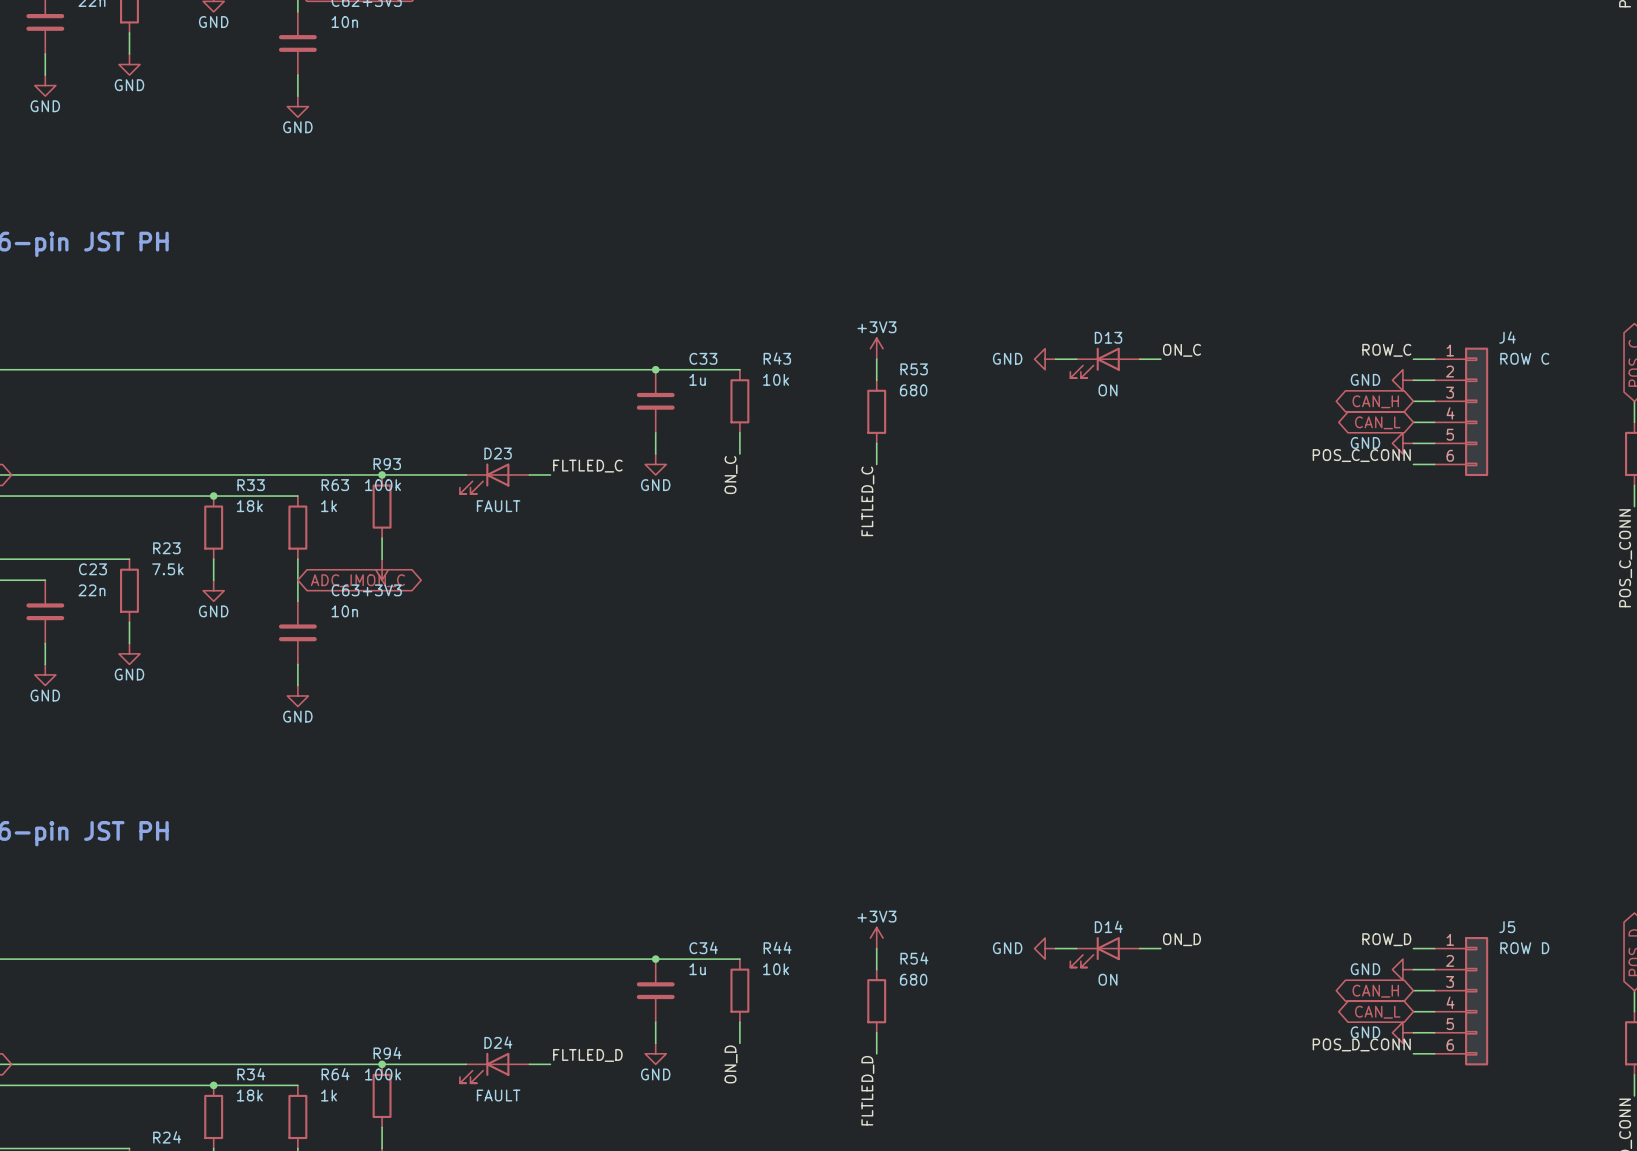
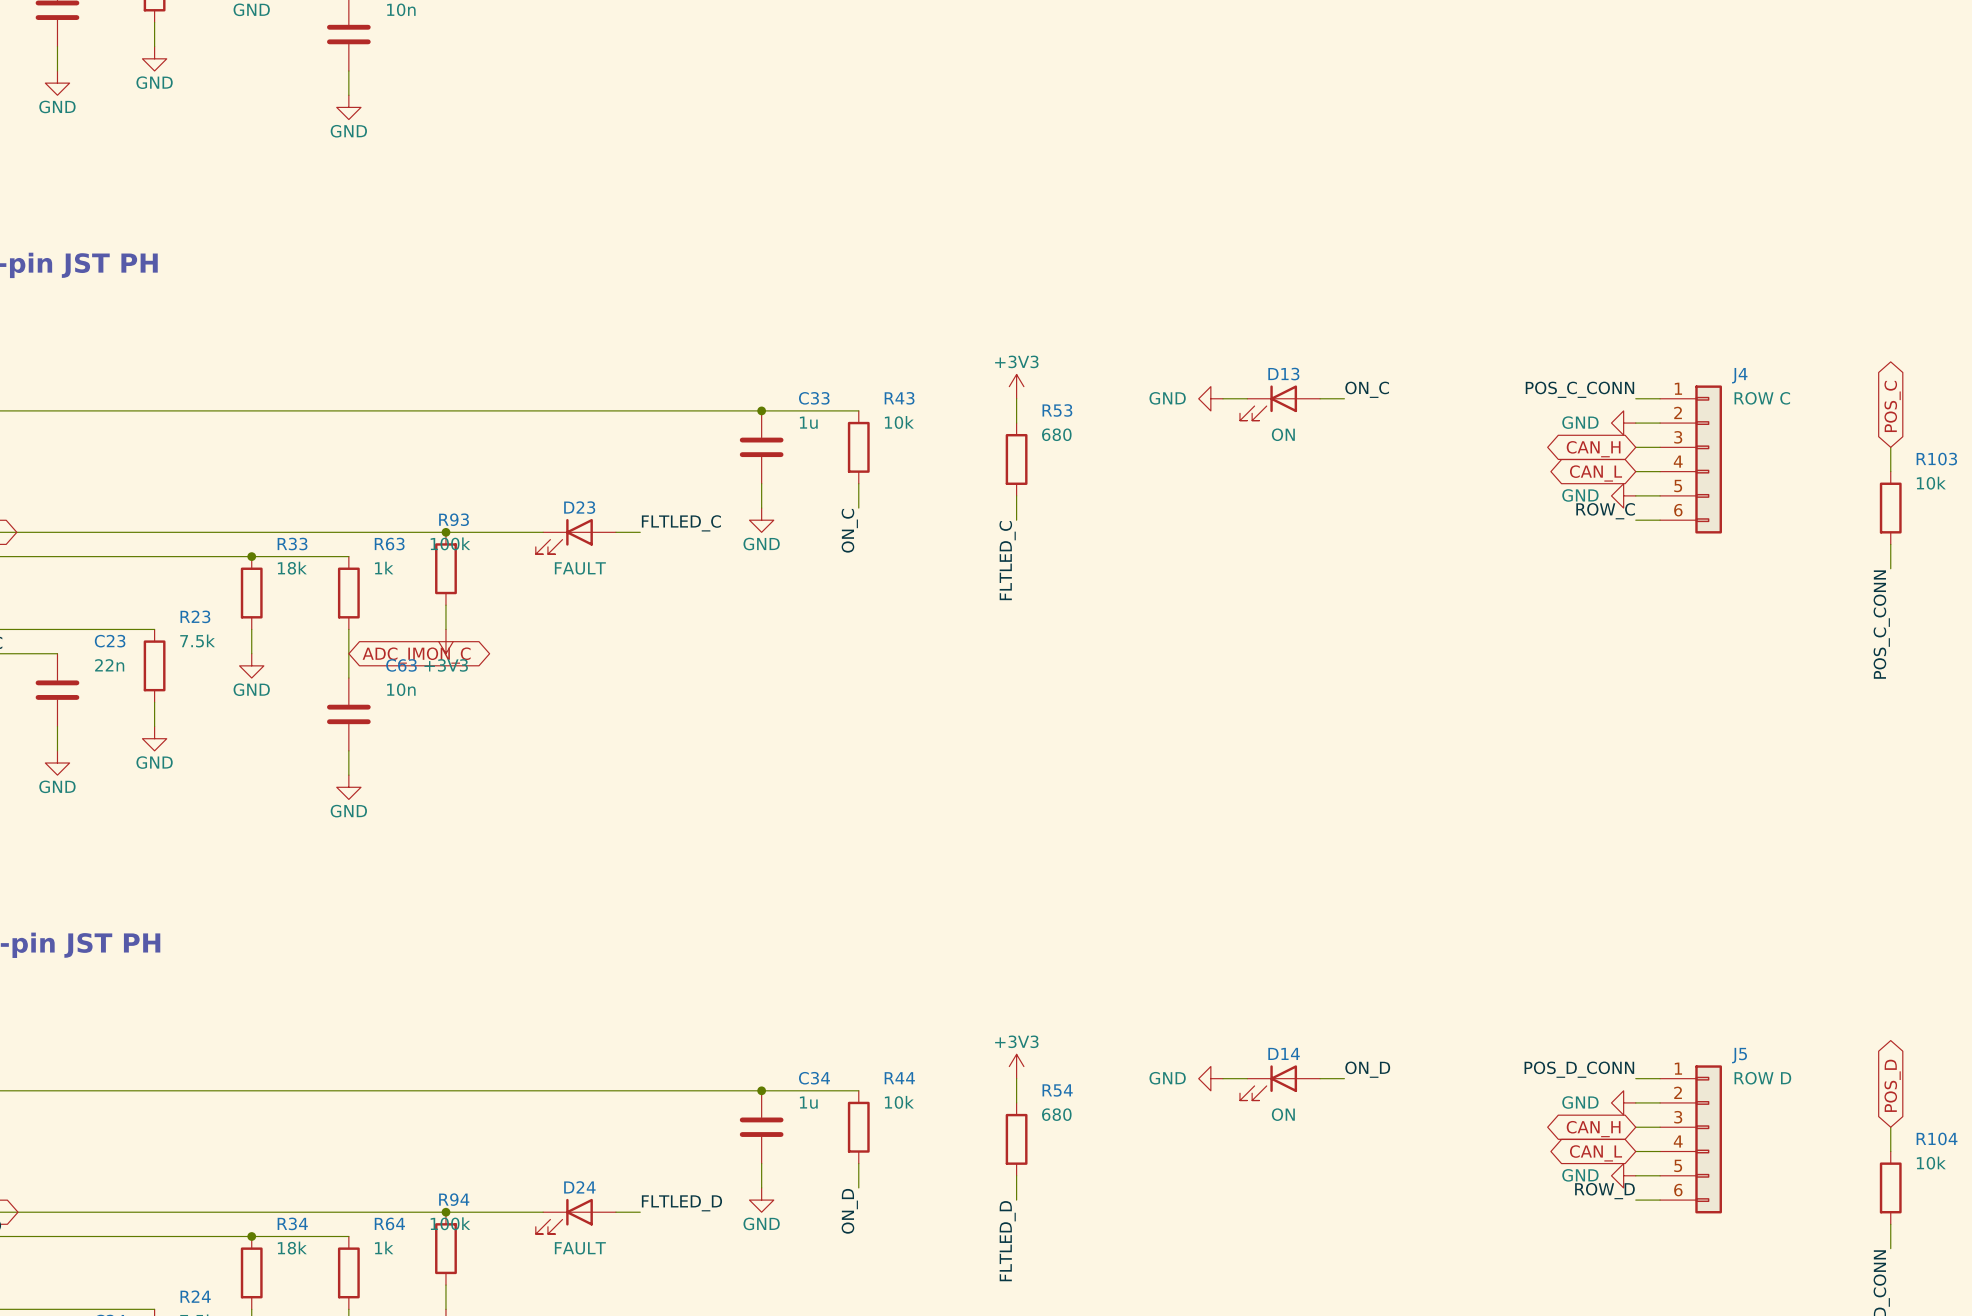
label: ROW_C (1386, 350) -> POS_C_CONN (1579, 389)
label: POS_C_CONN (1361, 455) -> ROW_C (1605, 511)
label: ROW_D (1386, 939) -> POS_D_CONN (1579, 1069)
label: POS_D_CONN (1361, 1044) -> ROW_D (1604, 1191)

